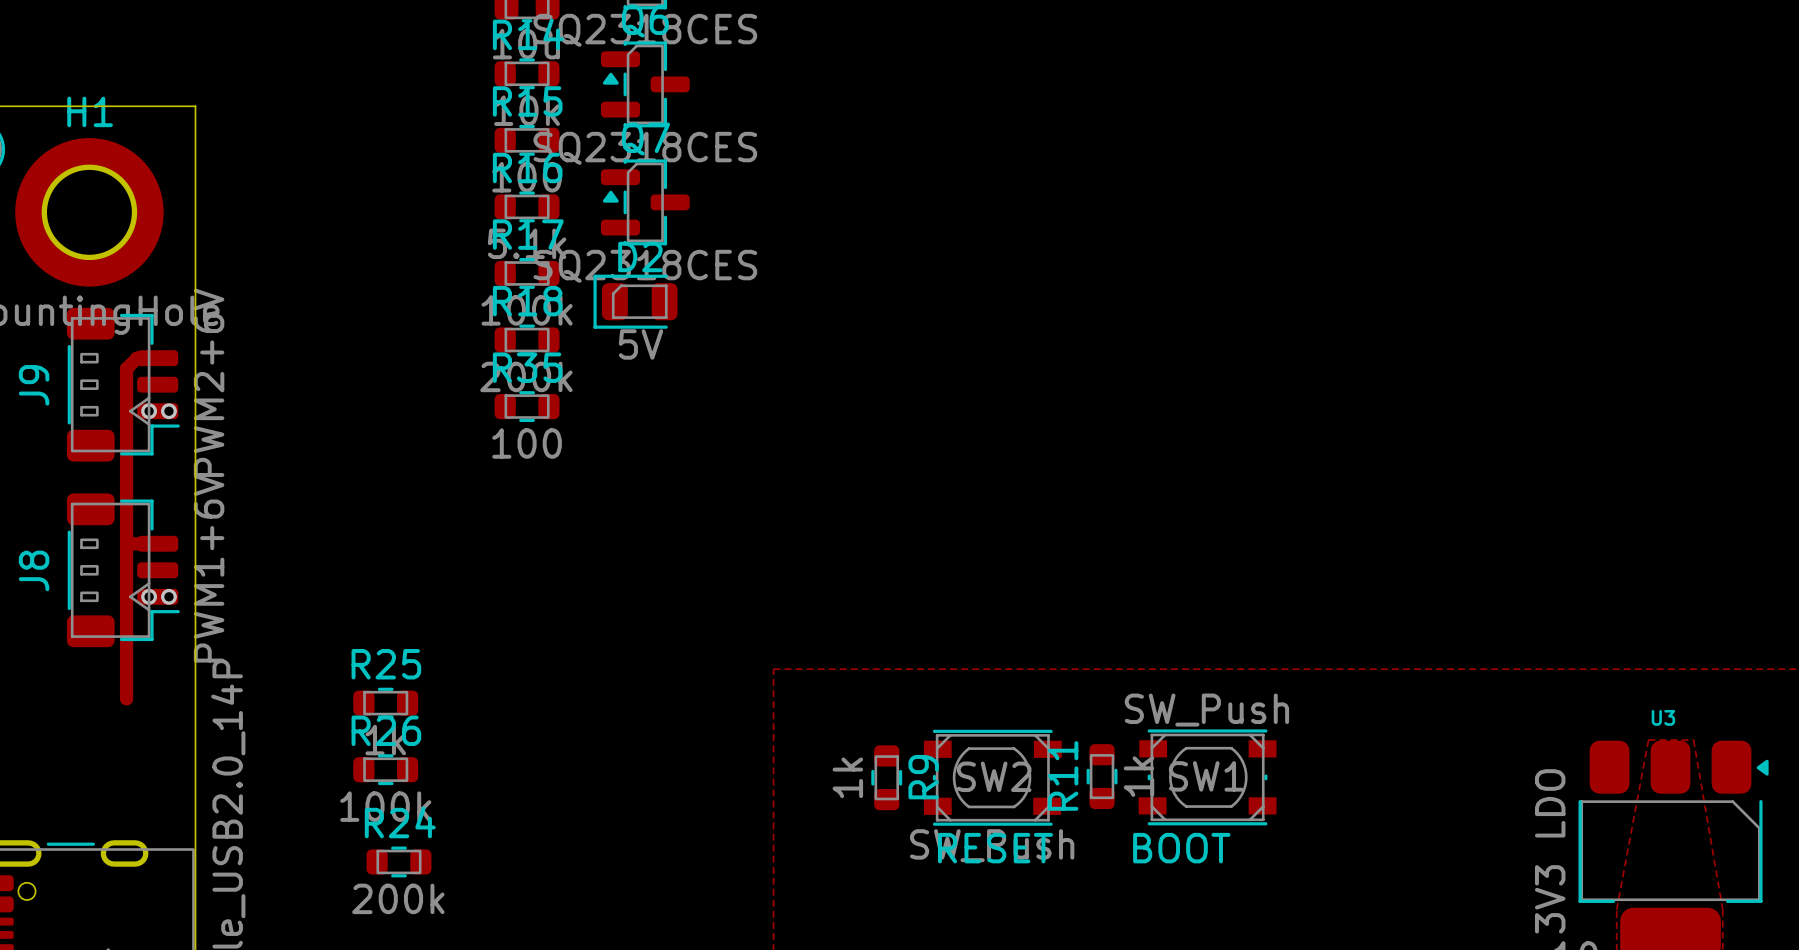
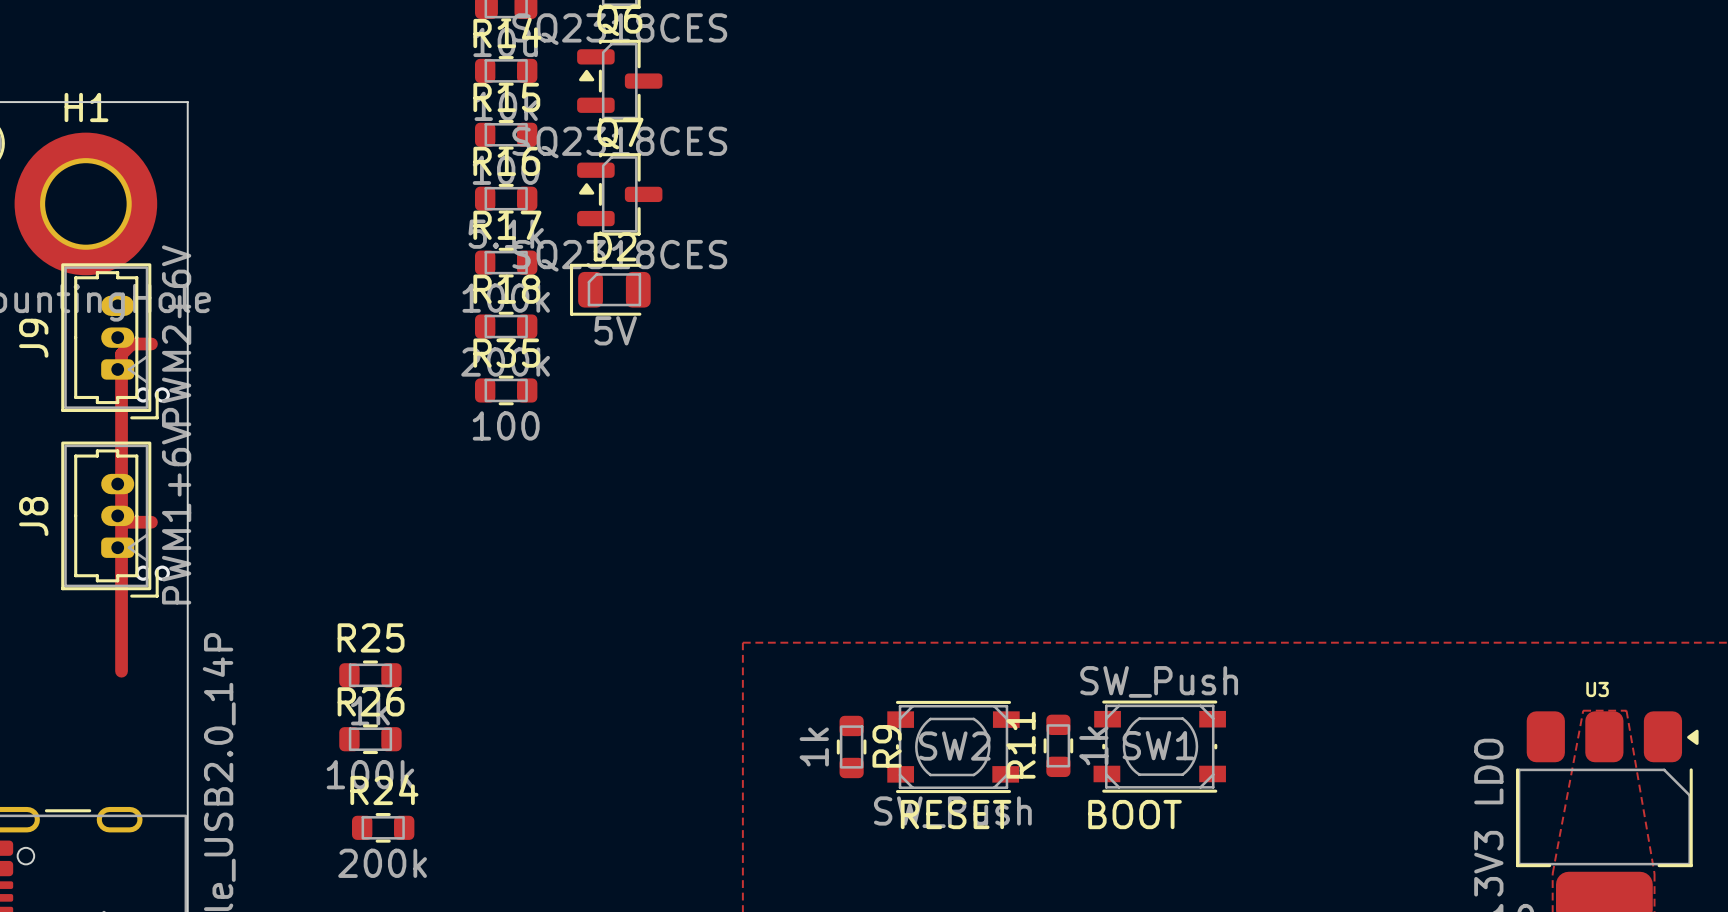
J9 footprint: [66, 307, 180, 462] -> [61, 263, 159, 420]
J8 footprint: [66, 493, 180, 648] -> [61, 441, 159, 598]

